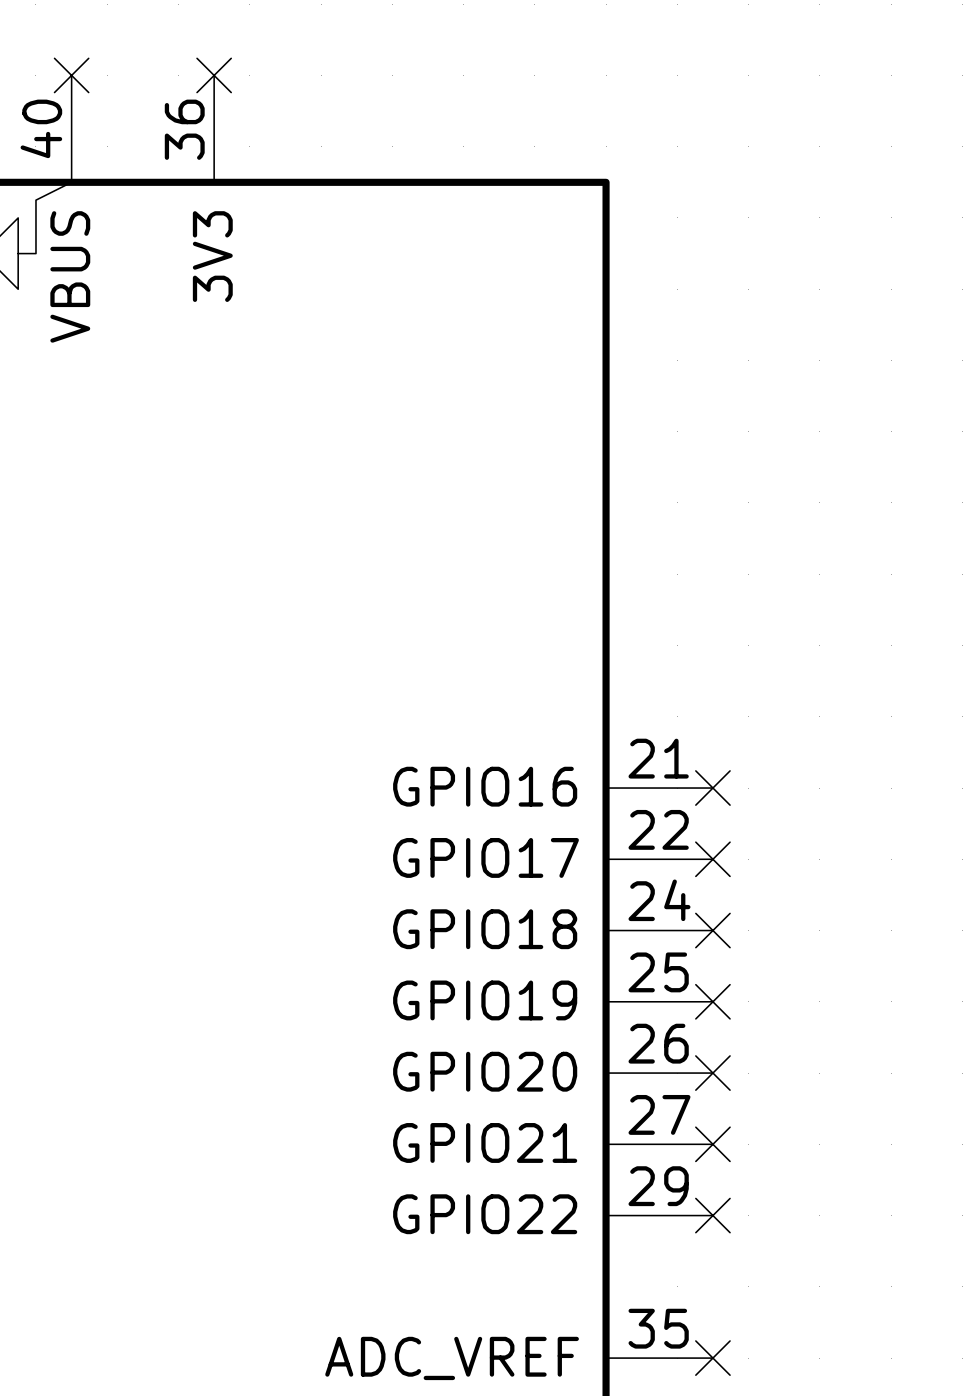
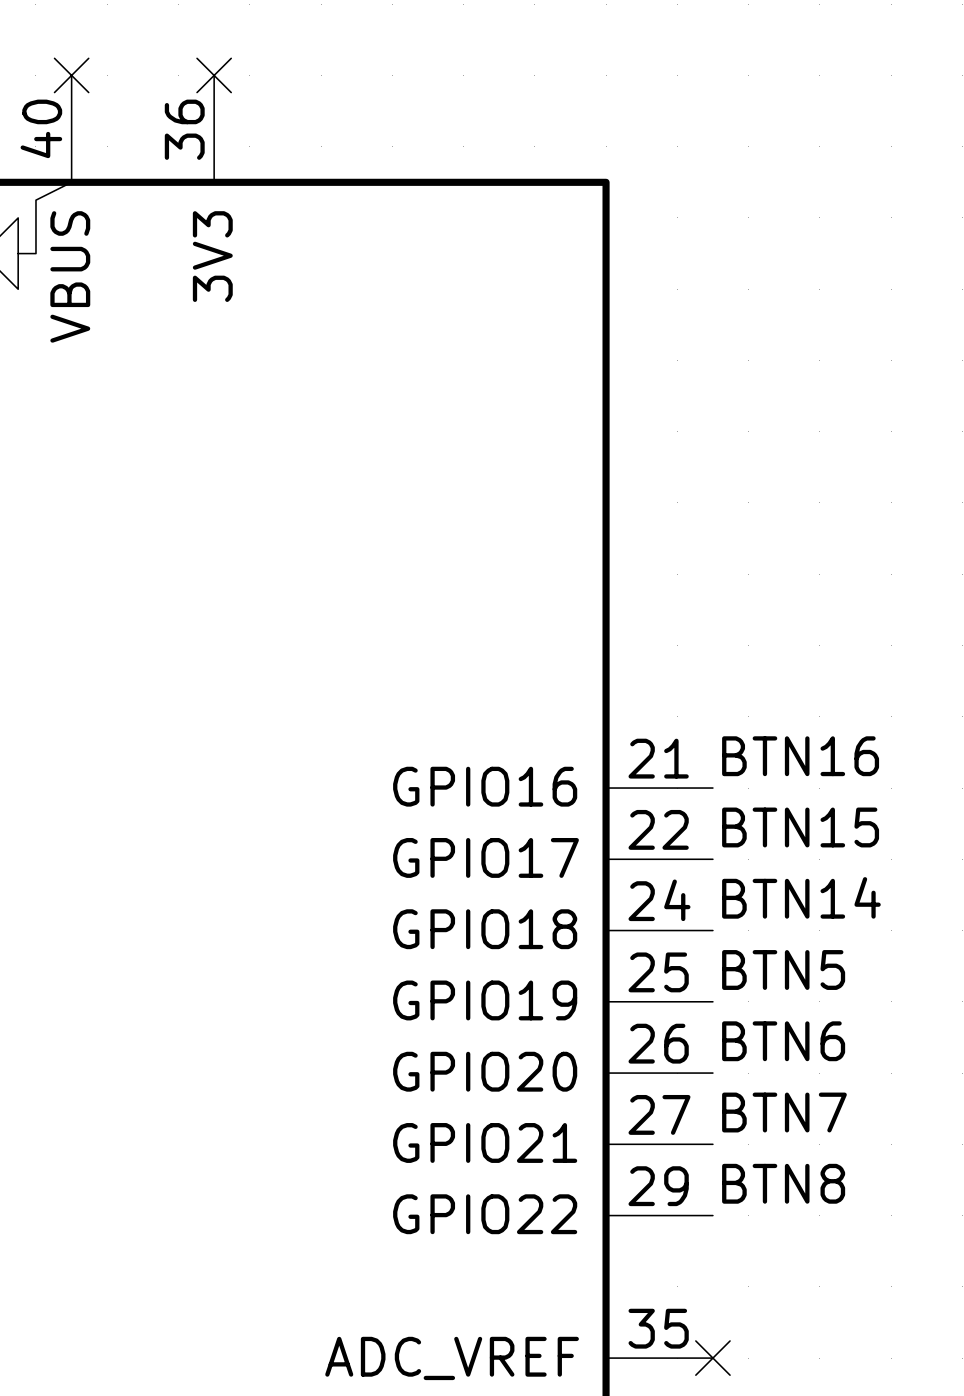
label: none -> BTN16 (800, 756)
no-connect mark: (712, 788) -> none
label: none -> BTN15 (800, 827)
no-connect mark: (712, 859) -> none
label: none -> BTN14 (801, 897)
no-connect mark: (712, 930) -> none
label: none -> BTN5 (783, 970)
no-connect mark: (712, 1001) -> none
label: none -> BTN6 (783, 1041)
no-connect mark: (712, 1073) -> none
label: none -> BTN7 (784, 1112)
no-connect mark: (712, 1144) -> none
label: none -> BTN8 (783, 1183)
no-connect mark: (712, 1215) -> none

